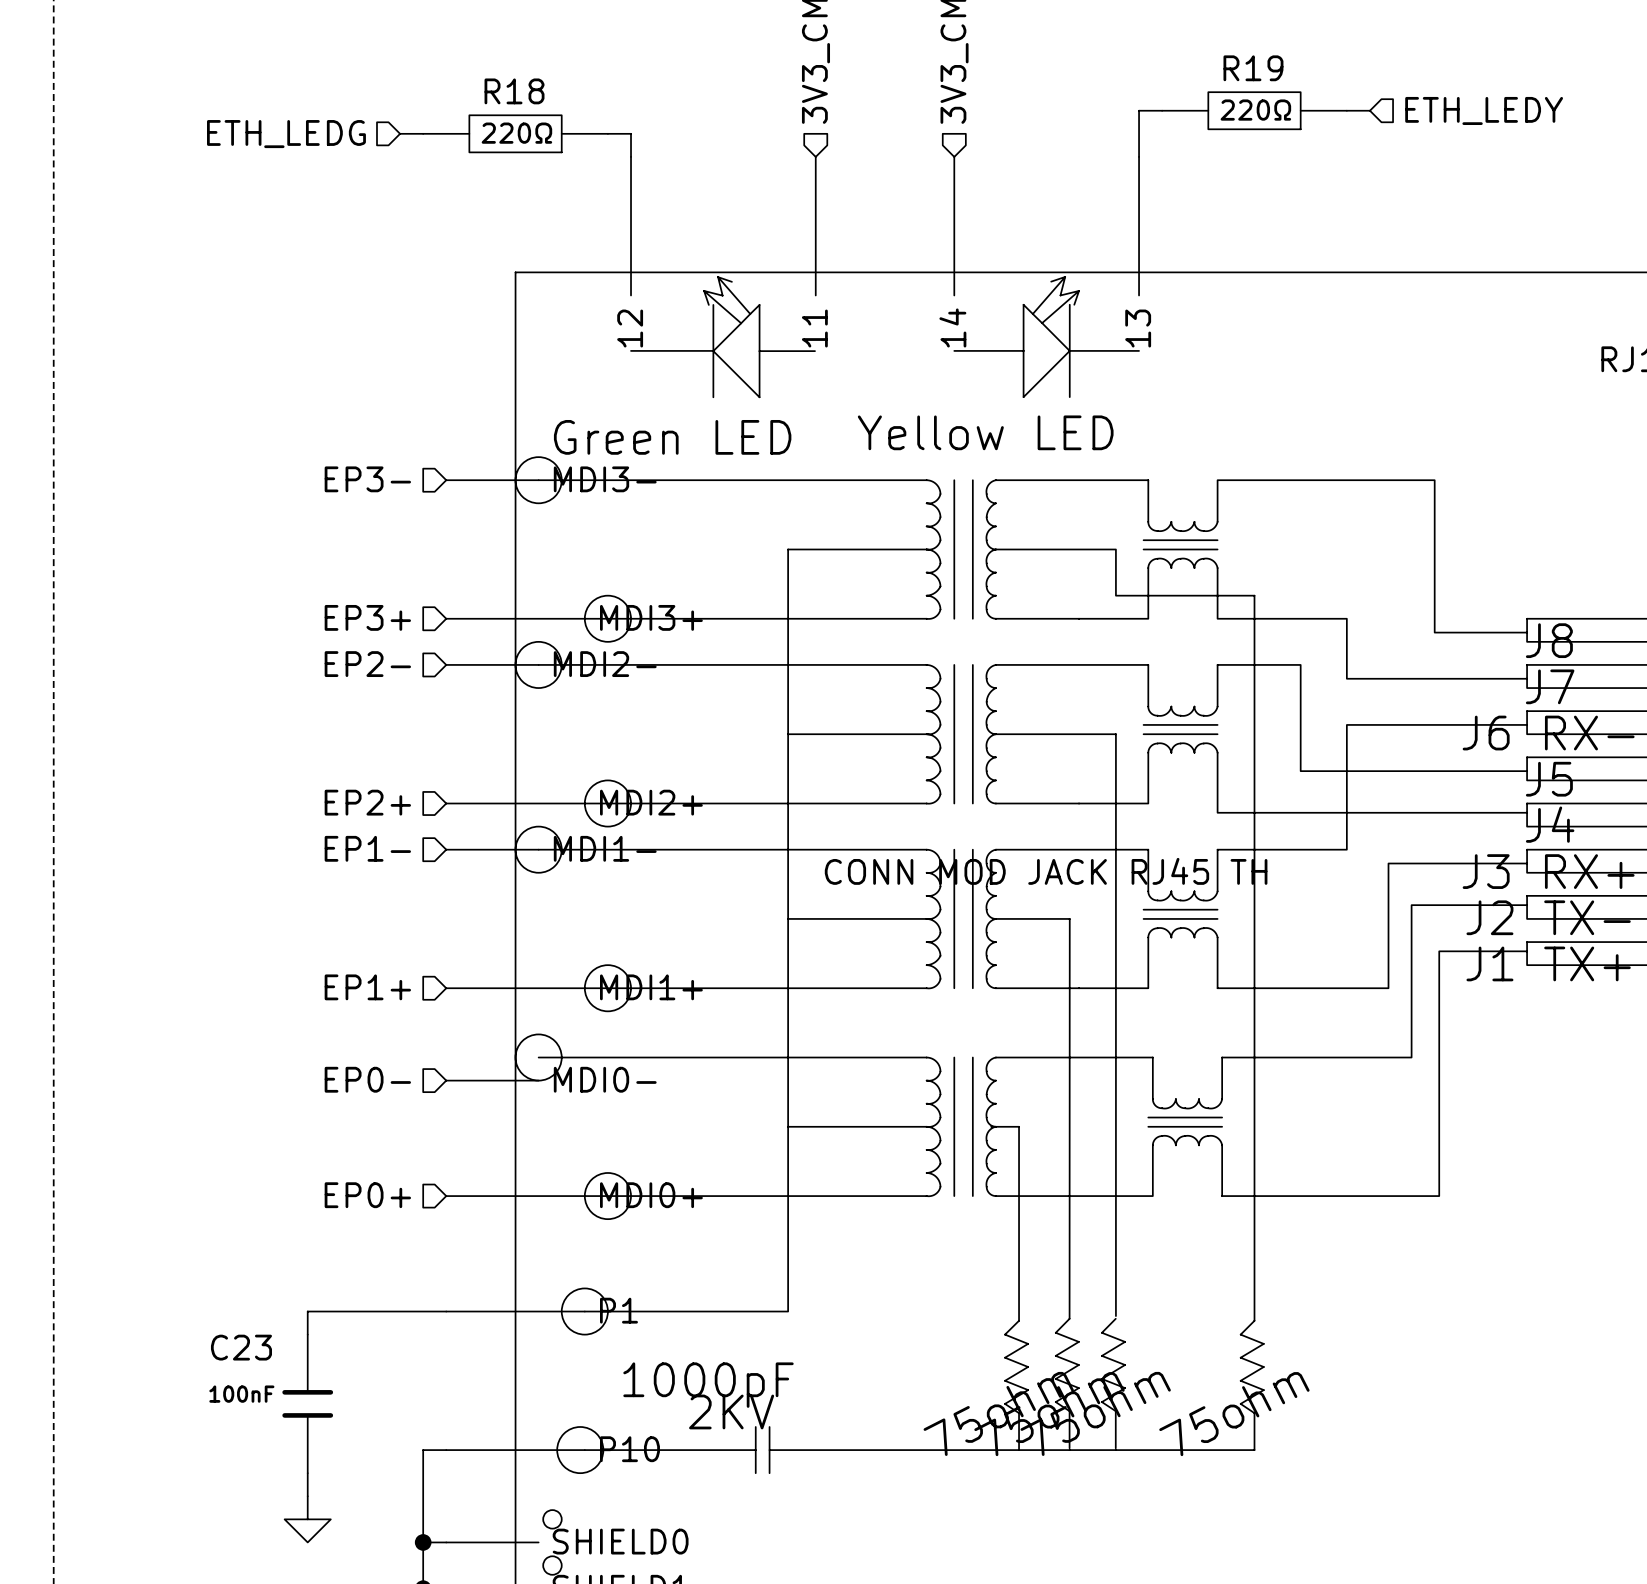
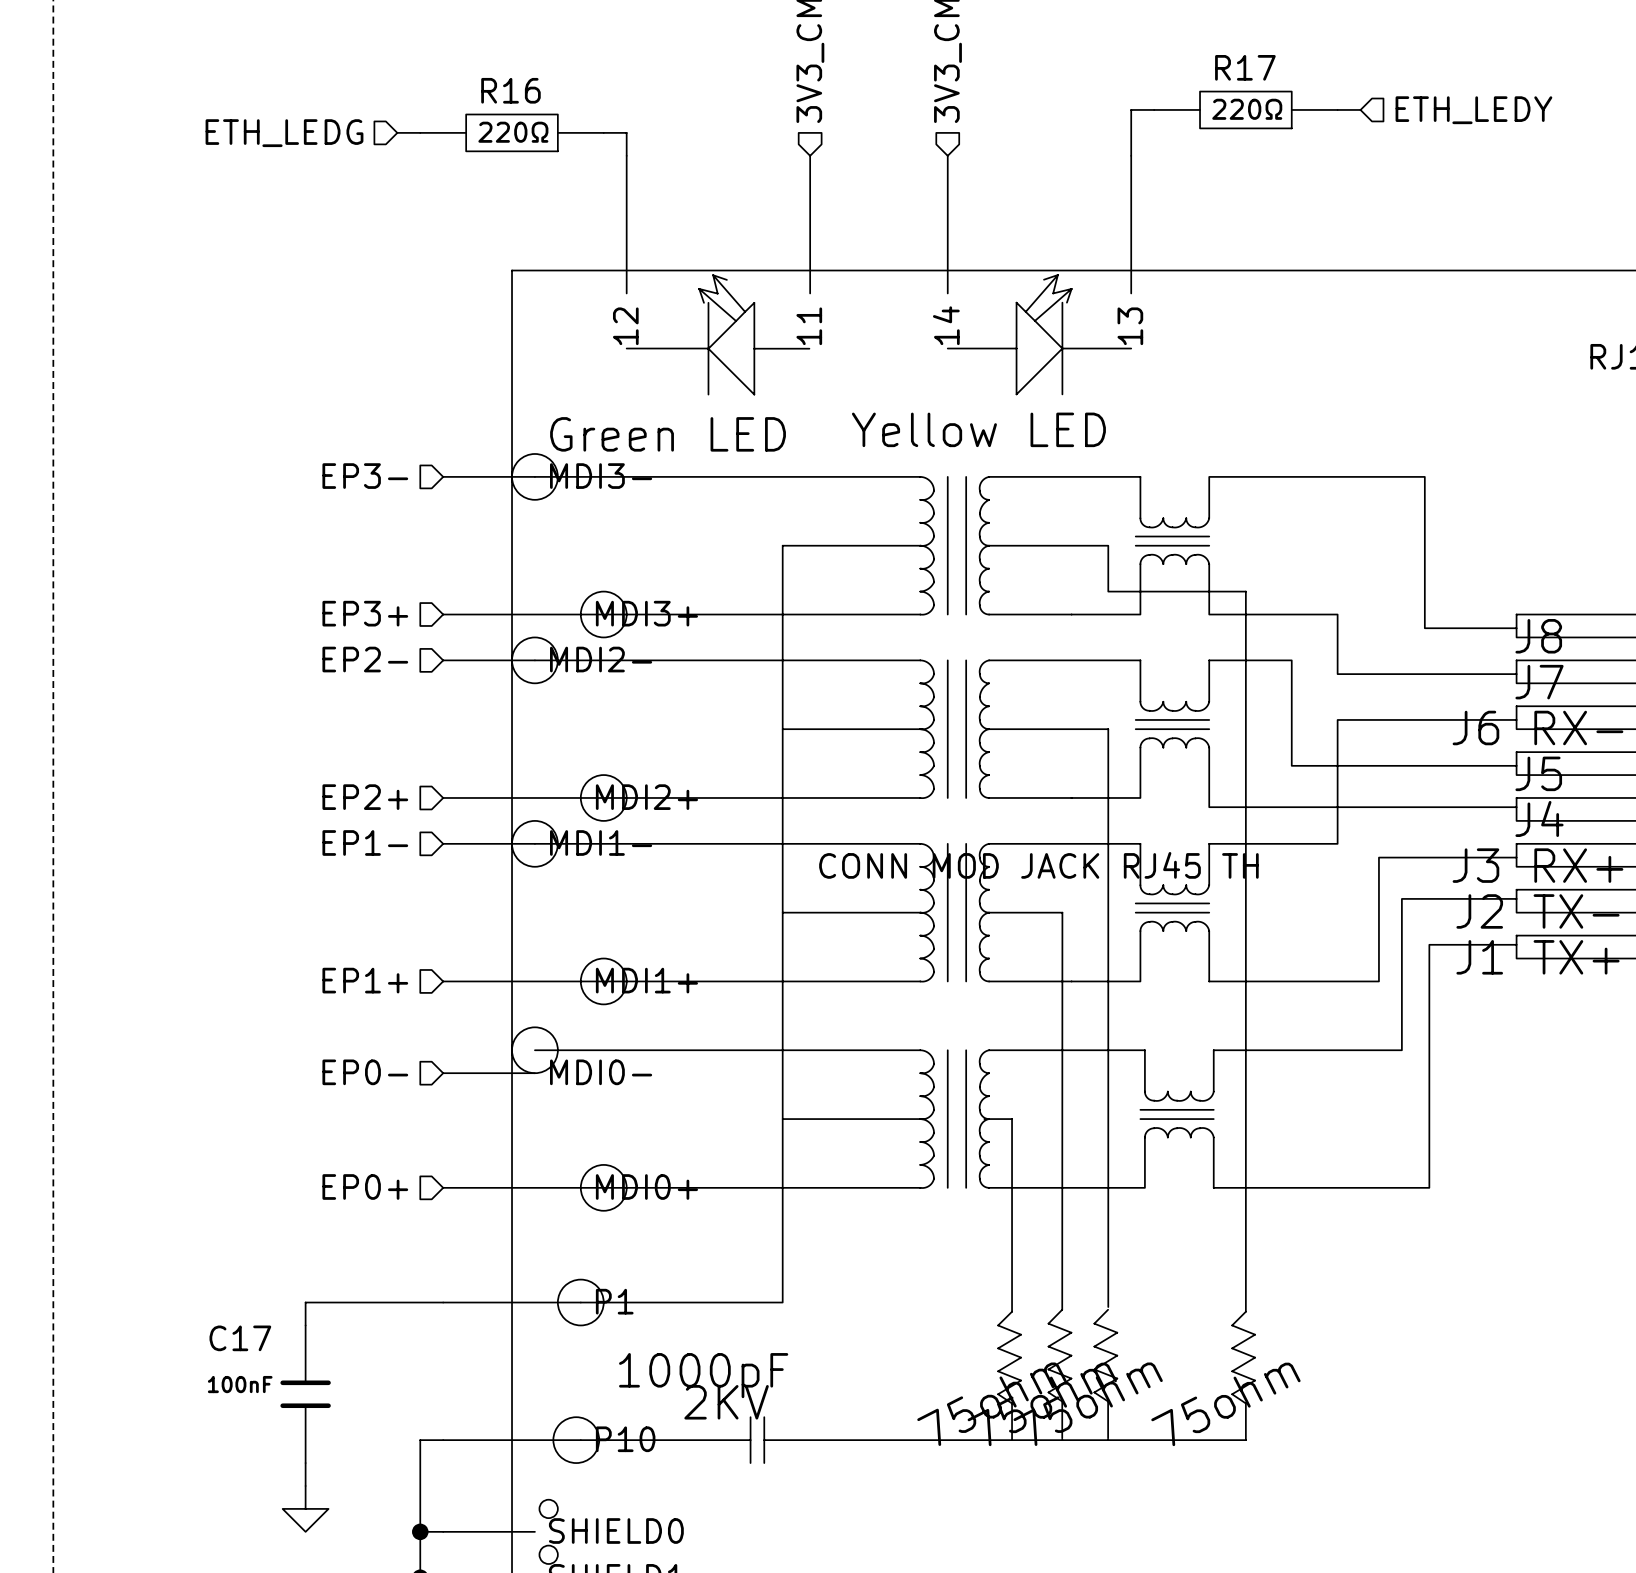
R19 name: R19 (1253, 68) -> R17 (1245, 67)
R18 name: R18 (514, 91) -> R16 (510, 90)
C23 name: C23 (241, 1347) -> C17 (240, 1338)

